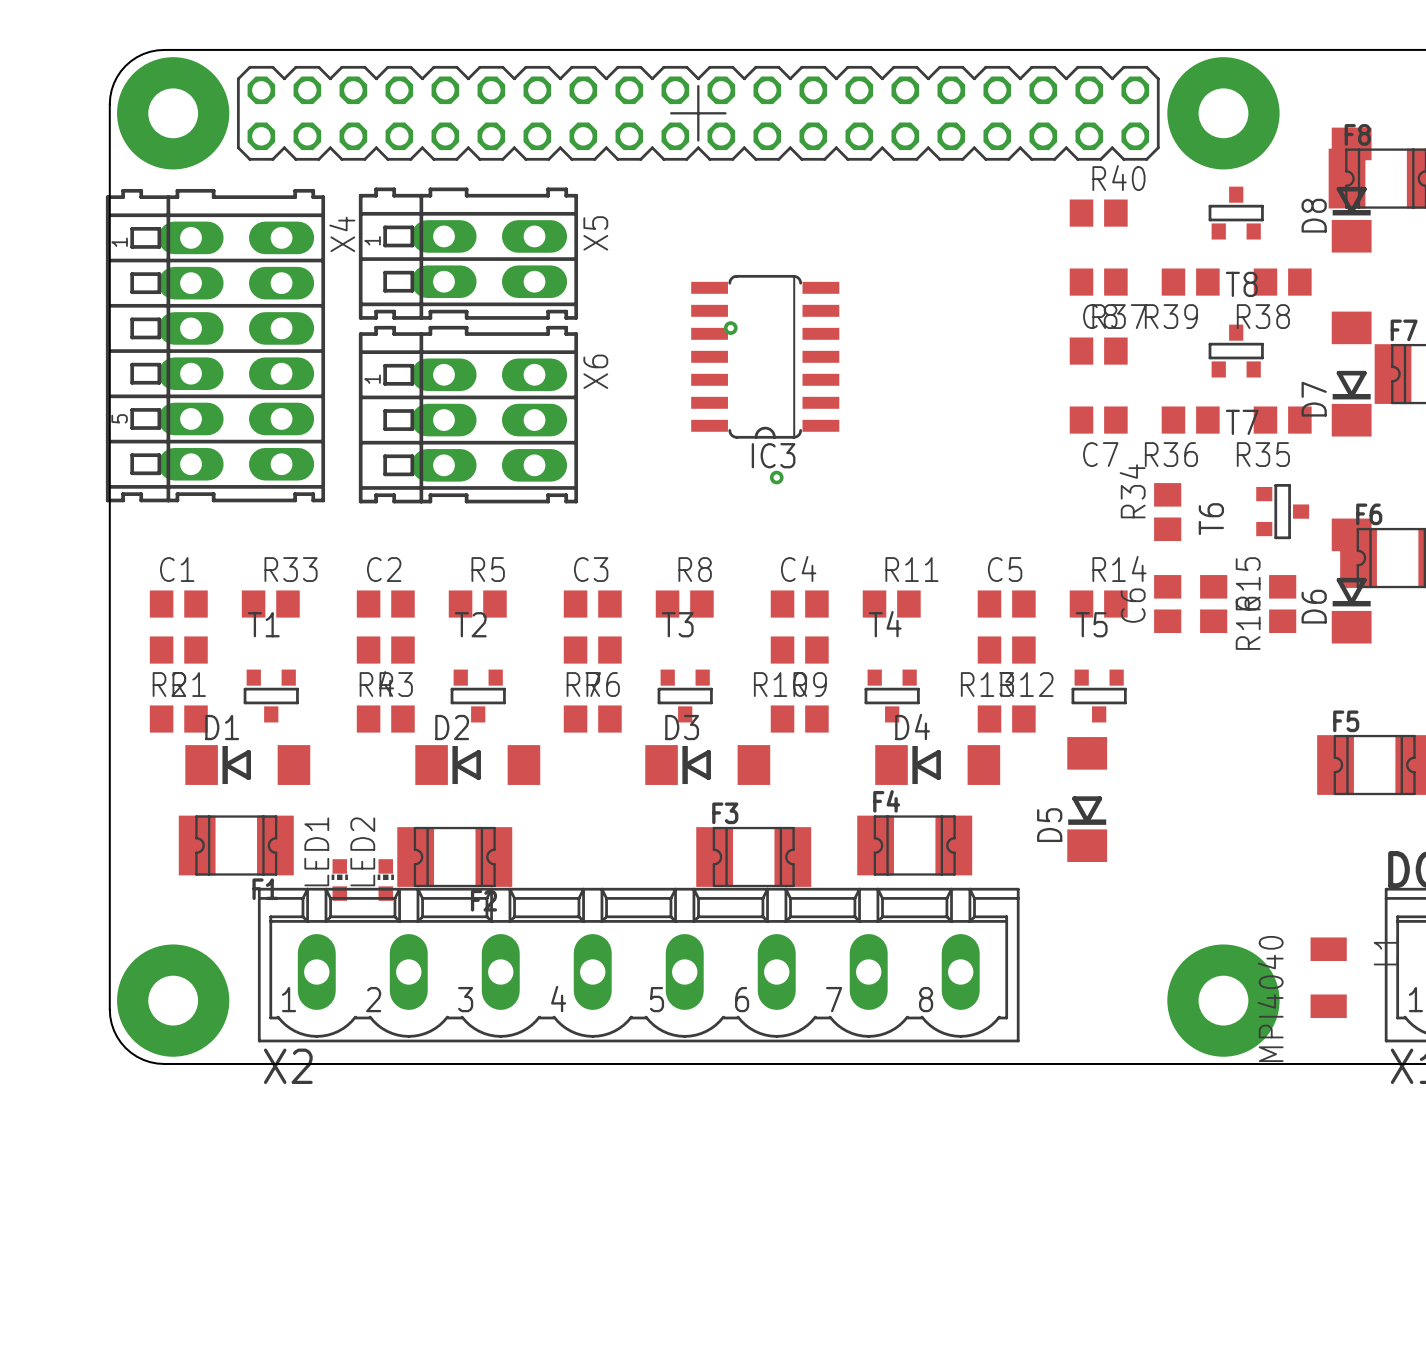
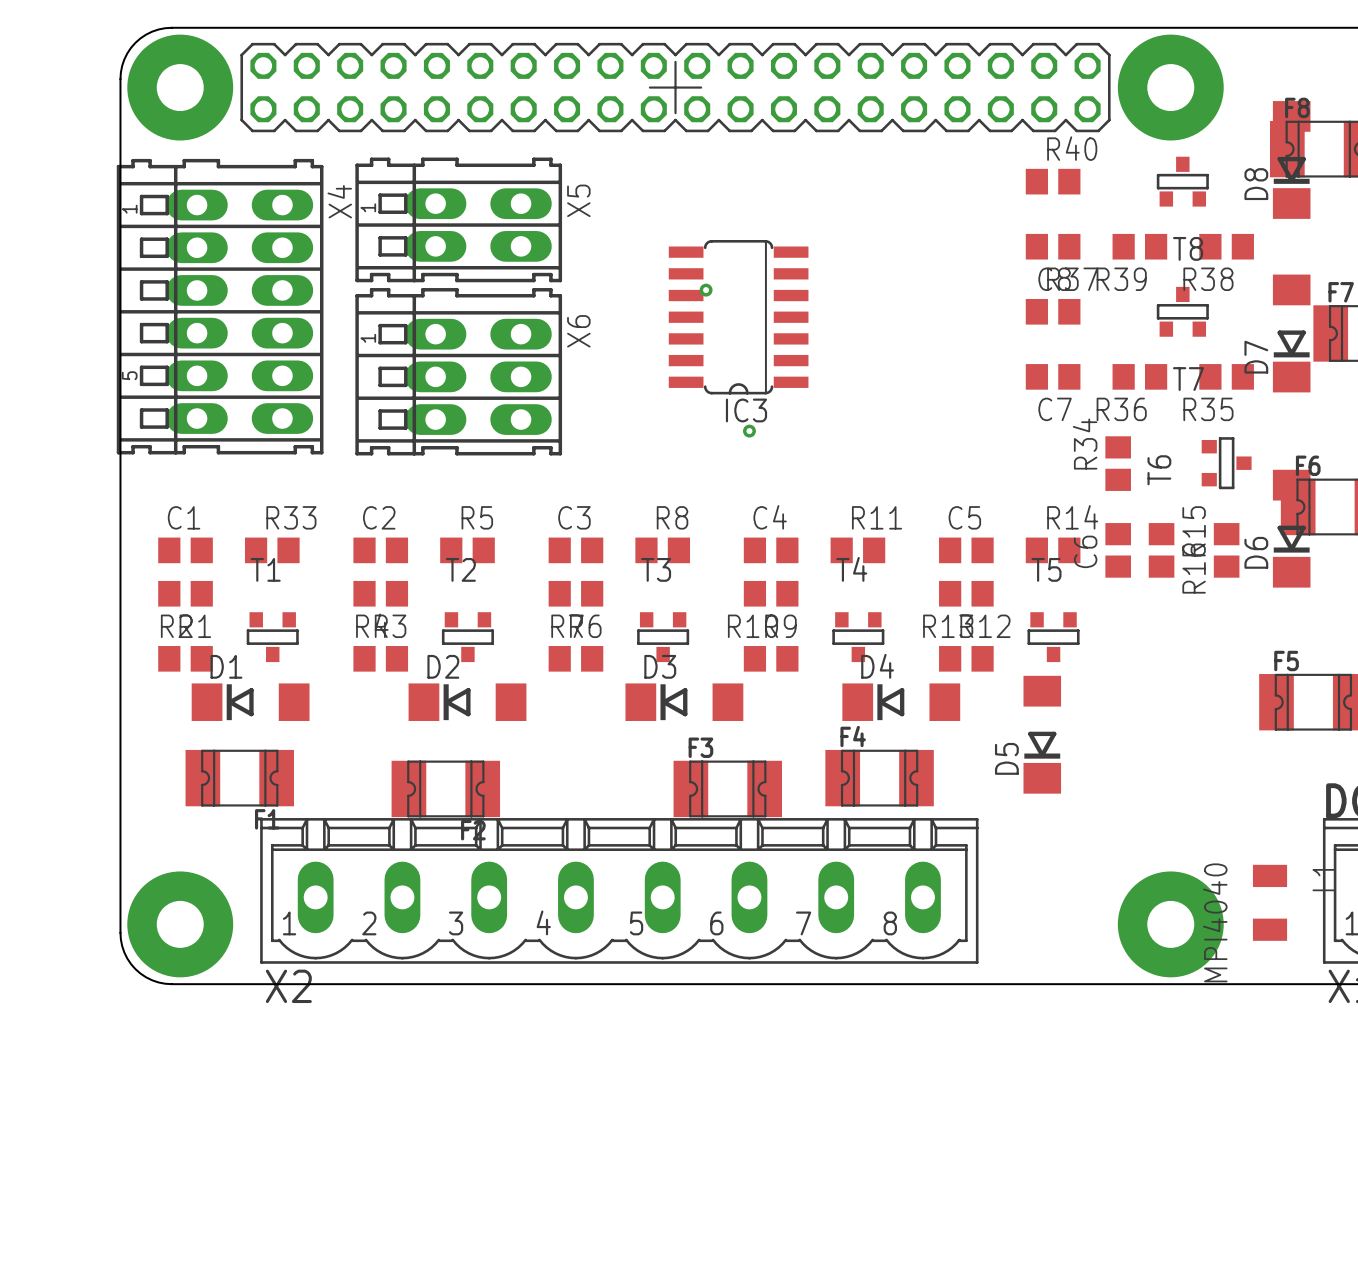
LED1: (339, 880) -> none
LED2: (385, 880) -> none

